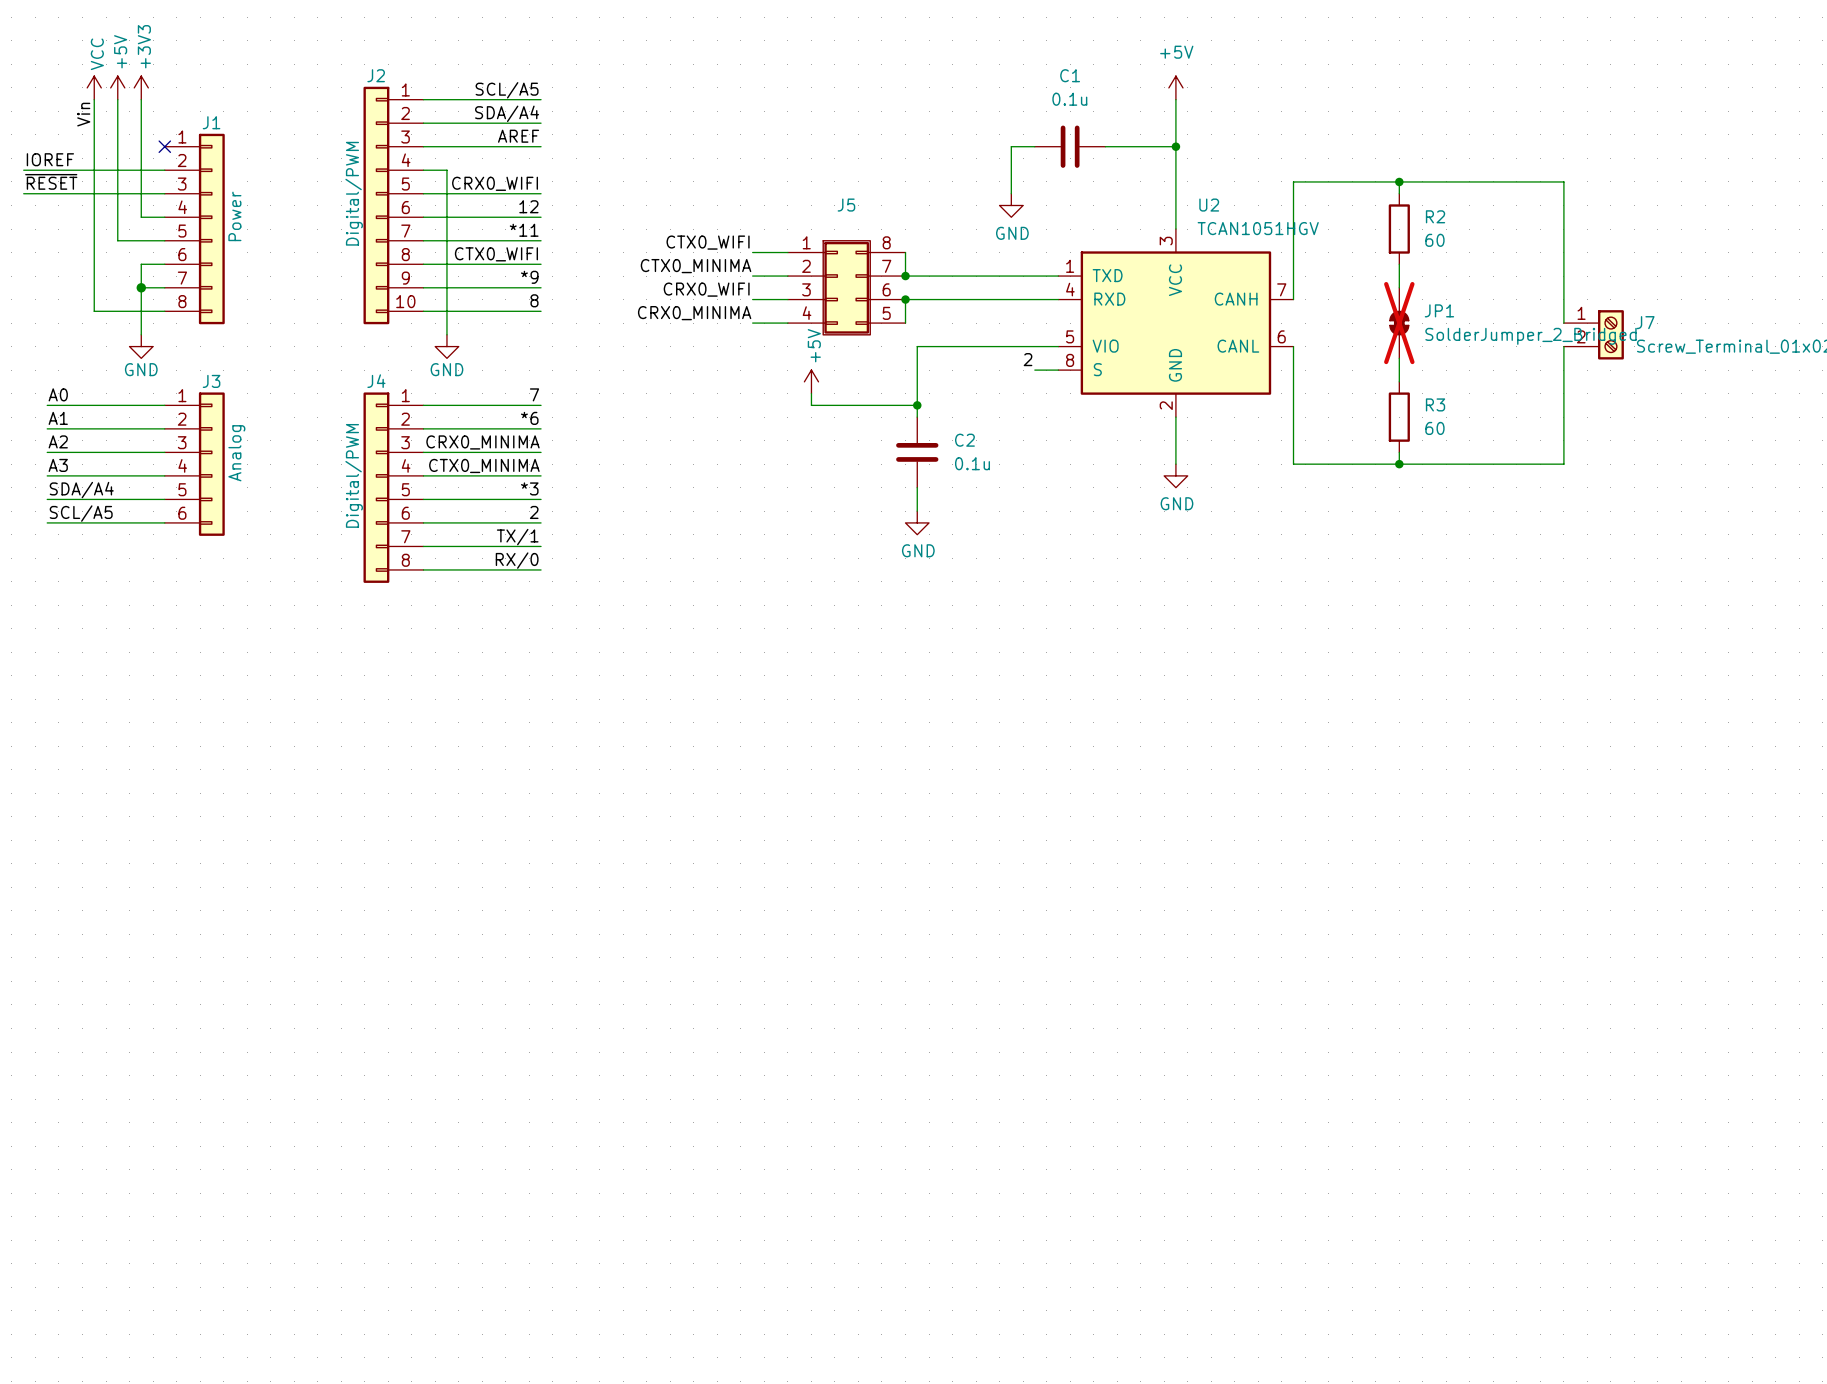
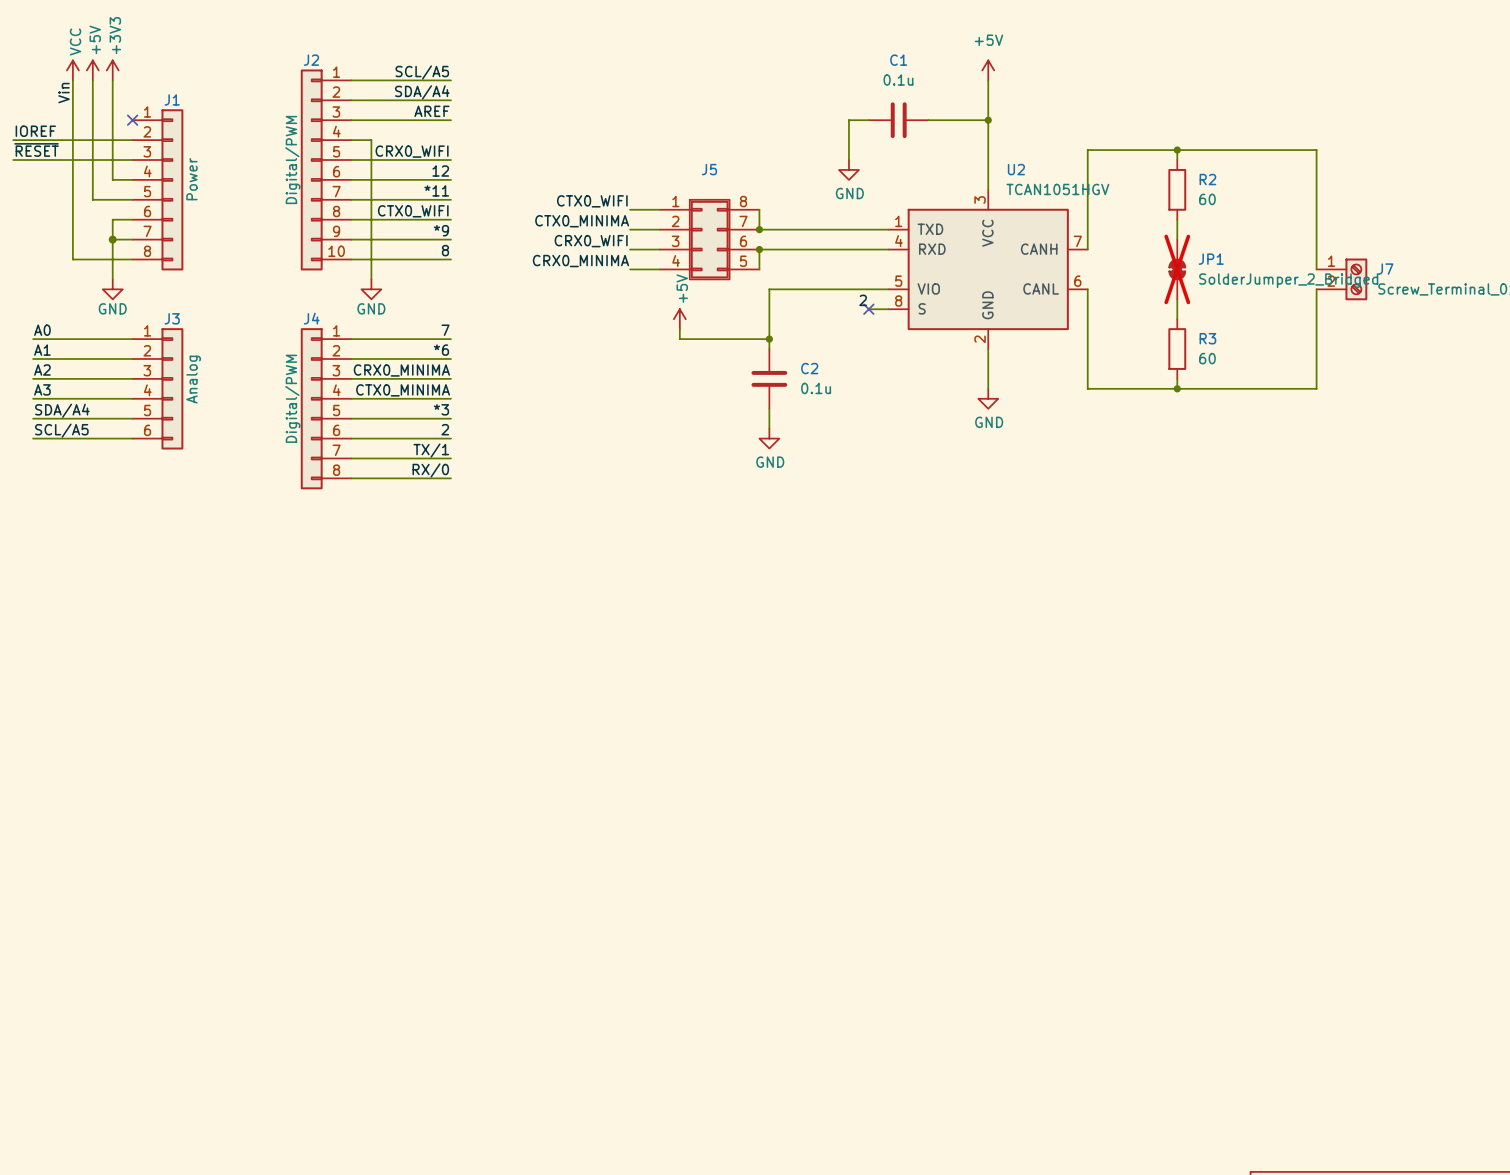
no-connect mark: none -> (868, 309)

